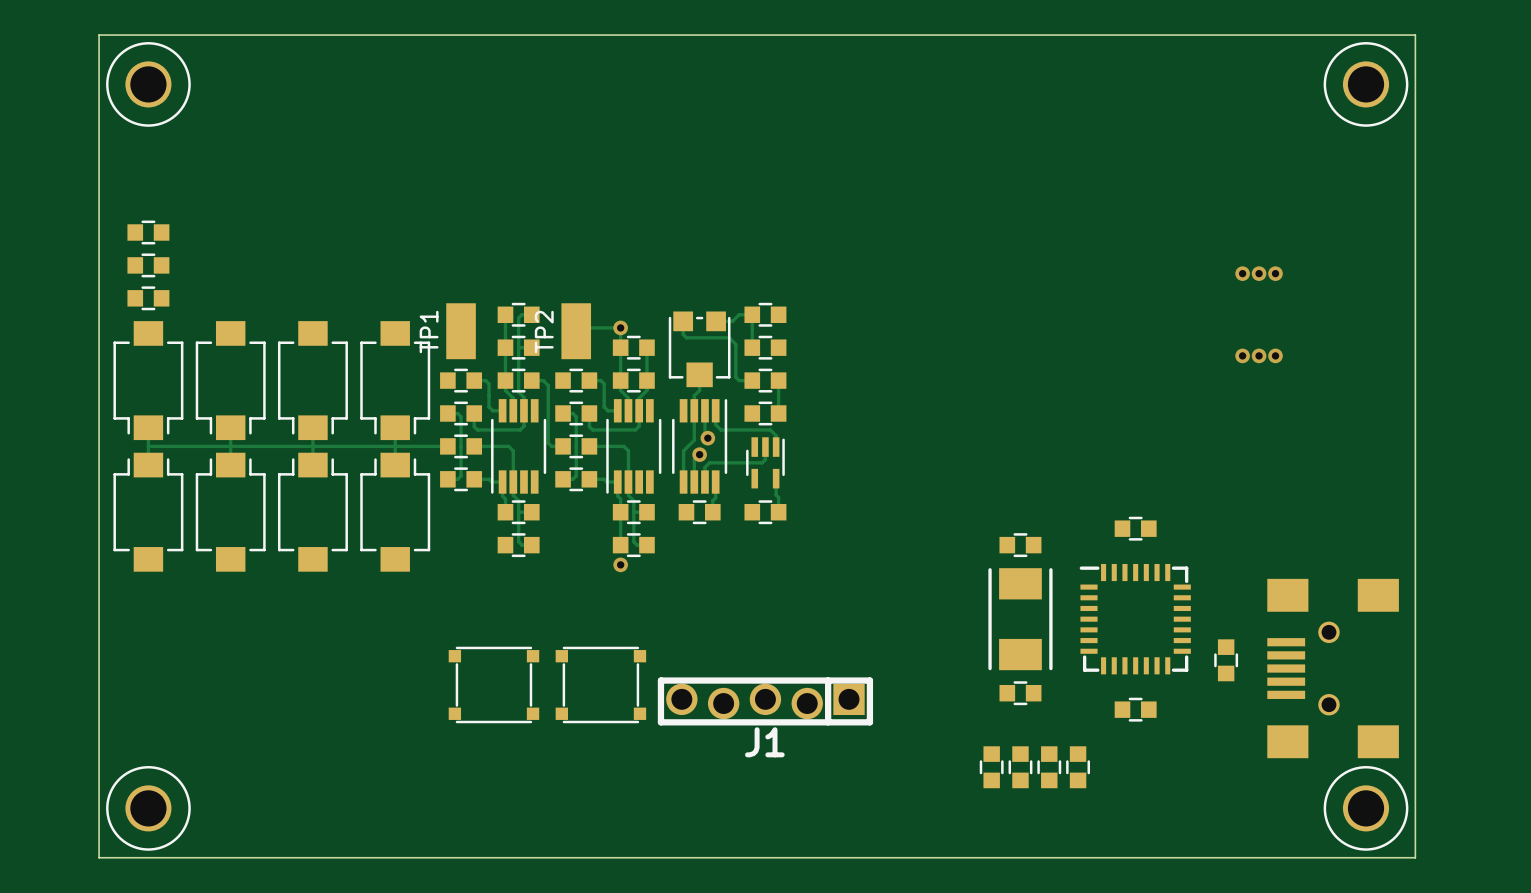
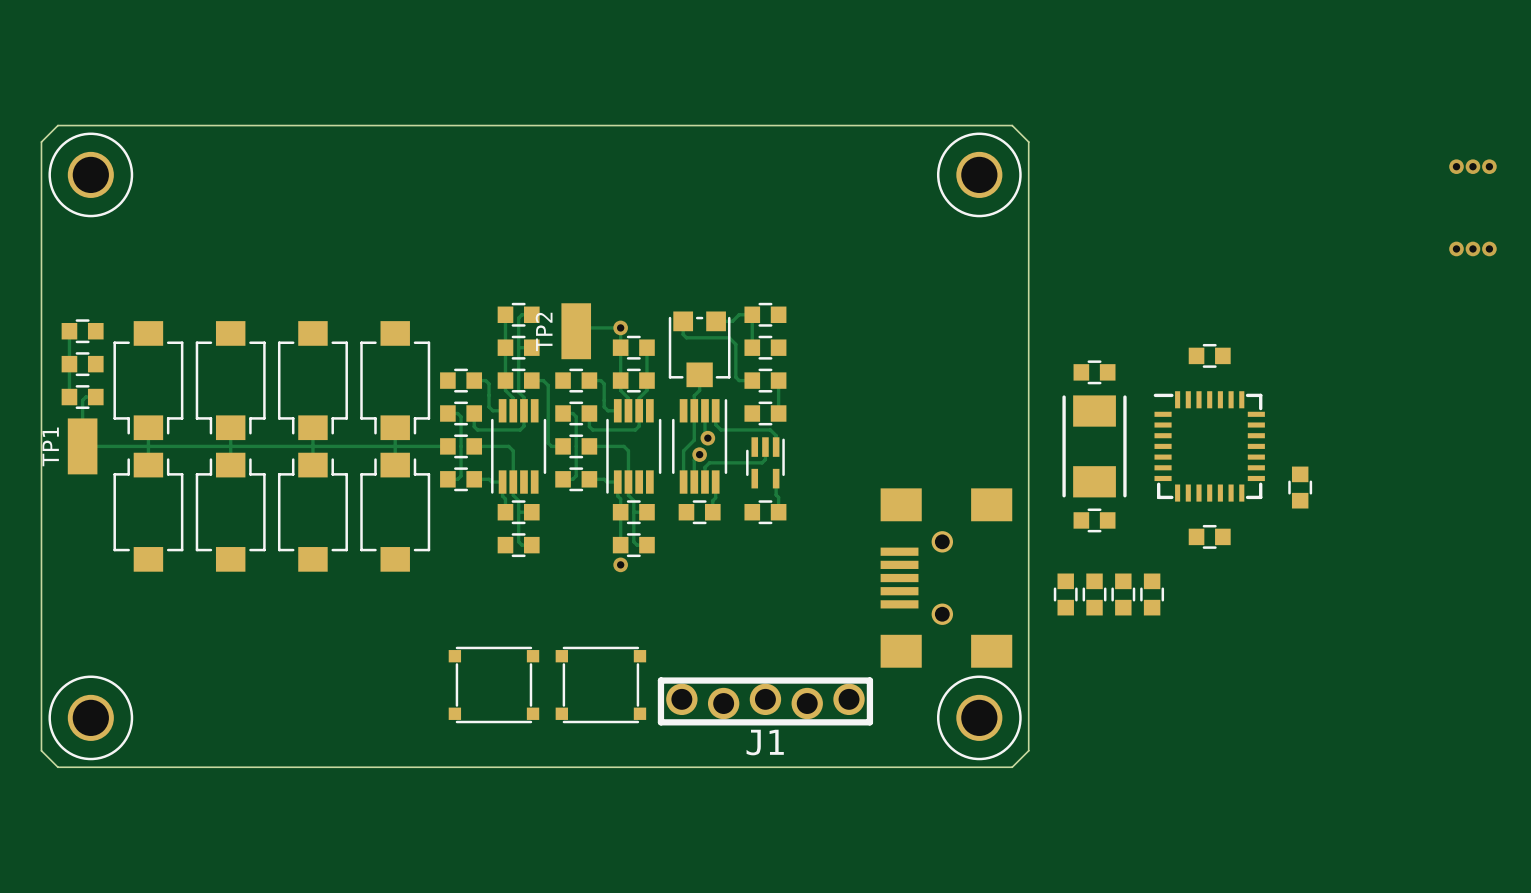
board edge: (99, 35) (99, 857) (1415, 857) (1415, 35) (99, 35) -> (57, 125) (41, 142) (41, 750) (57, 767) (1012, 767) (1028, 750) (1028, 142) (1012, 125) (57, 125)
part position: (148, 84) -> (90, 174)
part: (1366, 84) -> none
via: none -> (1456, 166)
via: none -> (1472, 166)
via: none -> (1489, 166)
part: none -> (979, 174)
part: (148, 232) -> none
via: none -> (1456, 248)
via: none -> (1472, 248)
via: none -> (1489, 248)
part: (148, 265) -> none
via: (1242, 273) -> none
via: (1259, 273) -> none
via: (1275, 273) -> none
part: (148, 298) -> none
track: none -> (69, 331) (69, 397)
part: none -> (82, 331)
TP1 position: (461, 331) -> (82, 446)
part: none -> (1209, 355)
via: (1242, 355) -> none
via: (1259, 355) -> none
via: (1275, 355) -> none
part: none -> (82, 364)
part: none -> (1094, 372)
part: none -> (82, 397)
track: none -> (95, 397) (85, 397) (82, 400) (82, 446) (148, 446)
part: none -> (1300, 487)
part: none -> (1094, 520)
part: (1135, 528) -> none
part: none -> (1209, 536)
part: (1020, 545) -> none
part: none -> (1065, 594)
part: none -> (1094, 594)
part: none -> (1123, 594)
part: none -> (1152, 594)
part position: (1020, 619) -> (1094, 446)
part position: (1135, 619) -> (1209, 446)
part: (1226, 660) -> none
part position: (1333, 668) -> (946, 578)
J1 footprint: [657, 677, 874, 726] -> [657, 677, 874, 726]
part: (1020, 693) -> none
part: (1135, 709) -> none
part: none -> (979, 717)
part: (991, 767) -> none
part: (1020, 767) -> none
part: (1049, 767) -> none
part: (1078, 767) -> none
part position: (148, 808) -> (90, 717)
part: (1366, 808) -> none

